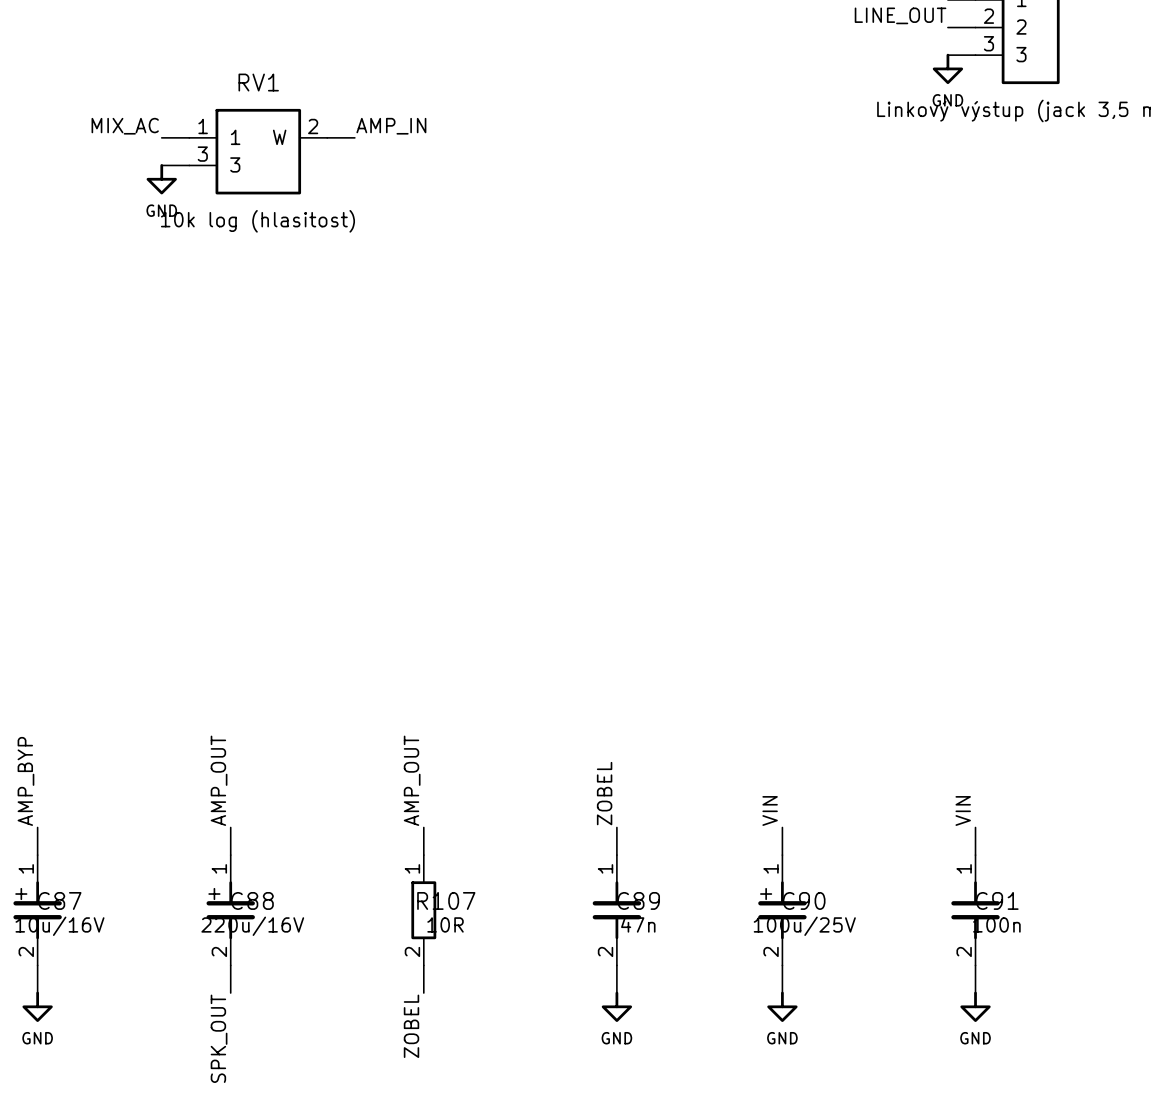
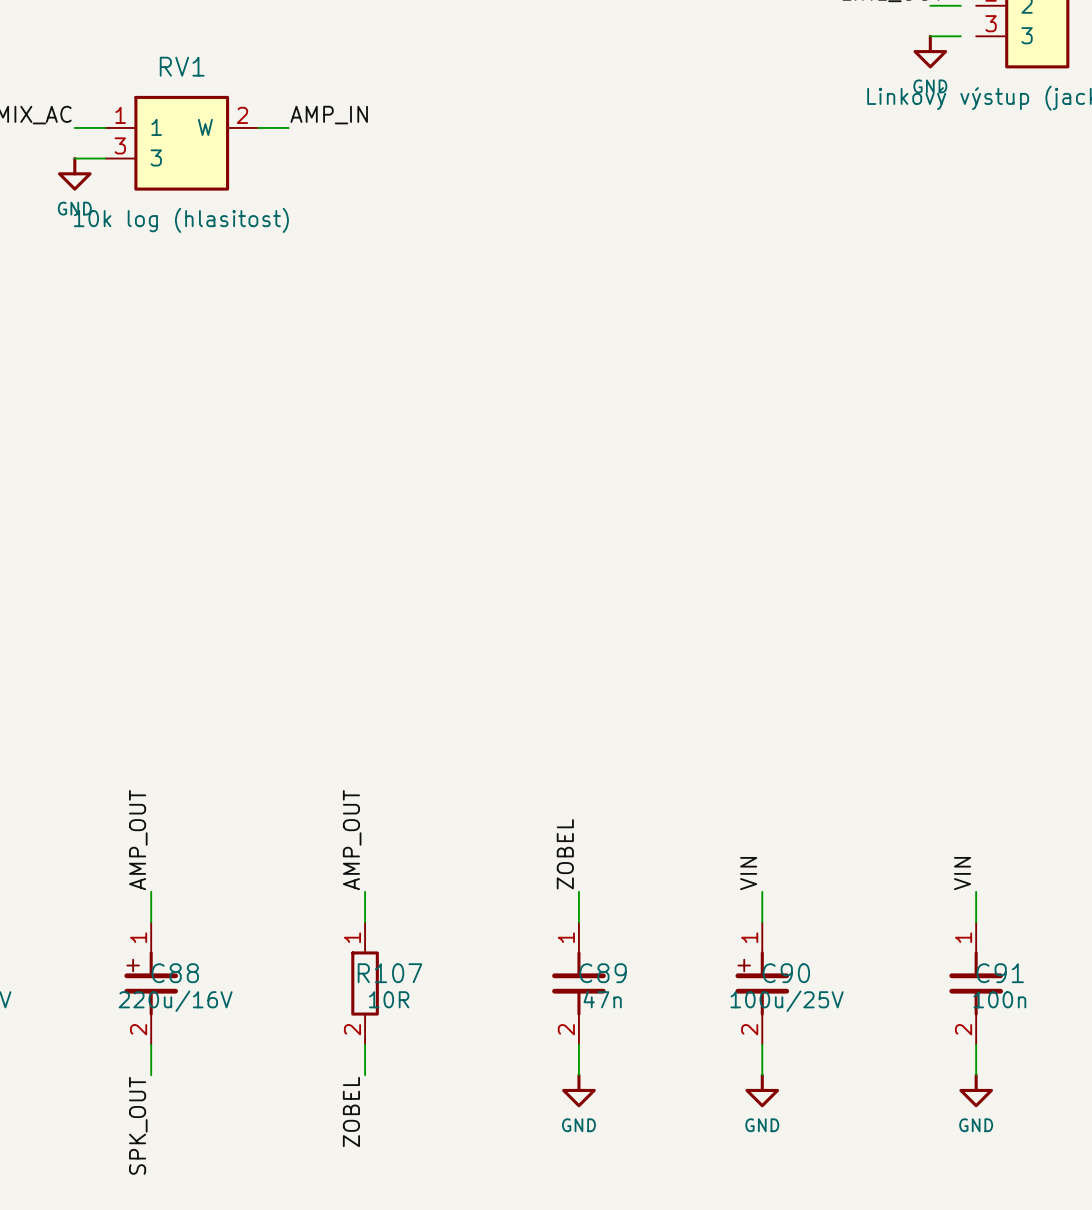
wire: (961, 27) (975, 27) -> (930, 5) (945, 5)
wire: (961, 55) (975, 55) -> (930, 36) (945, 36)
power symbol position: GND (947, 68) -> GND (930, 51)

